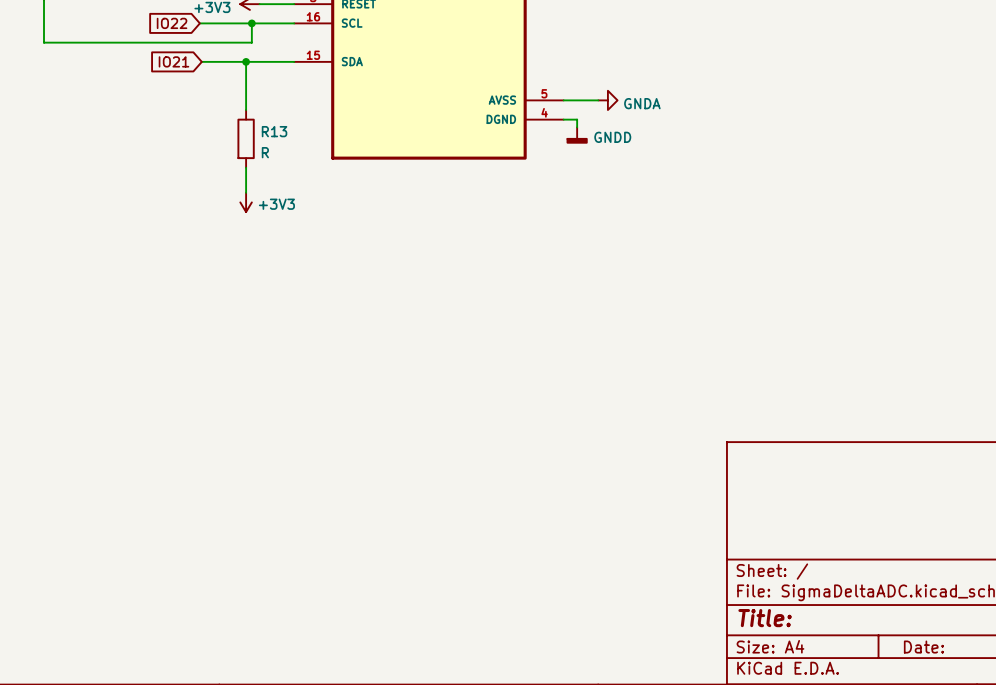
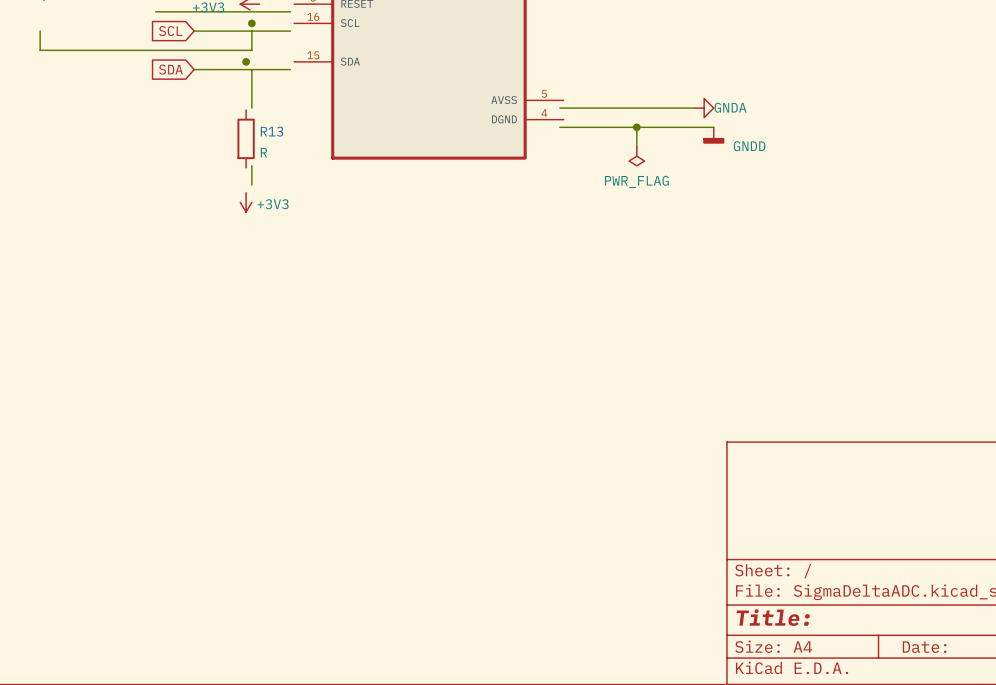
wire: (44, 0) (44, 42) (251, 42) -> (40, 31) (40, 50) (251, 50) (251, 42)
wire: (259, 4) (294, 4) -> none
wire: none -> (155, 11) (290, 11)
global label: IO22 (172, 23) -> none
wire: (199, 23) (294, 23) -> none
global label: none -> SCL (170, 31)
wire: none -> (194, 31) (290, 31)
global label: IO21 (173, 61) -> none
wire: (201, 61) (294, 61) -> none
wire: (246, 61) (246, 110) -> none
global label: none -> SDA (170, 69)
wire: none -> (194, 69) (290, 69)
wire: none -> (251, 69) (251, 108)
wire: (563, 100) (598, 100) -> none
power symbol position: GNDA (607, 100) -> GNDA (704, 108)
power symbol text position: GNDA (642, 103) -> GNDA (730, 107)
wire: none -> (559, 108) (694, 108)
wire: (563, 119) (577, 119) (577, 127) -> none
wire: none -> (559, 127) (713, 127)
wire: none -> (636, 127) (636, 146)
junction: none -> (636, 127)
power symbol position: GNDD (577, 135) -> GNDD (713, 135)
power symbol text position: GNDD (612, 137) -> GNDD (749, 146)
power symbol: none -> PWR_FLAG (636, 156)
wire: none -> (251, 165) (251, 185)
wire: (246, 167) (246, 192) -> none

